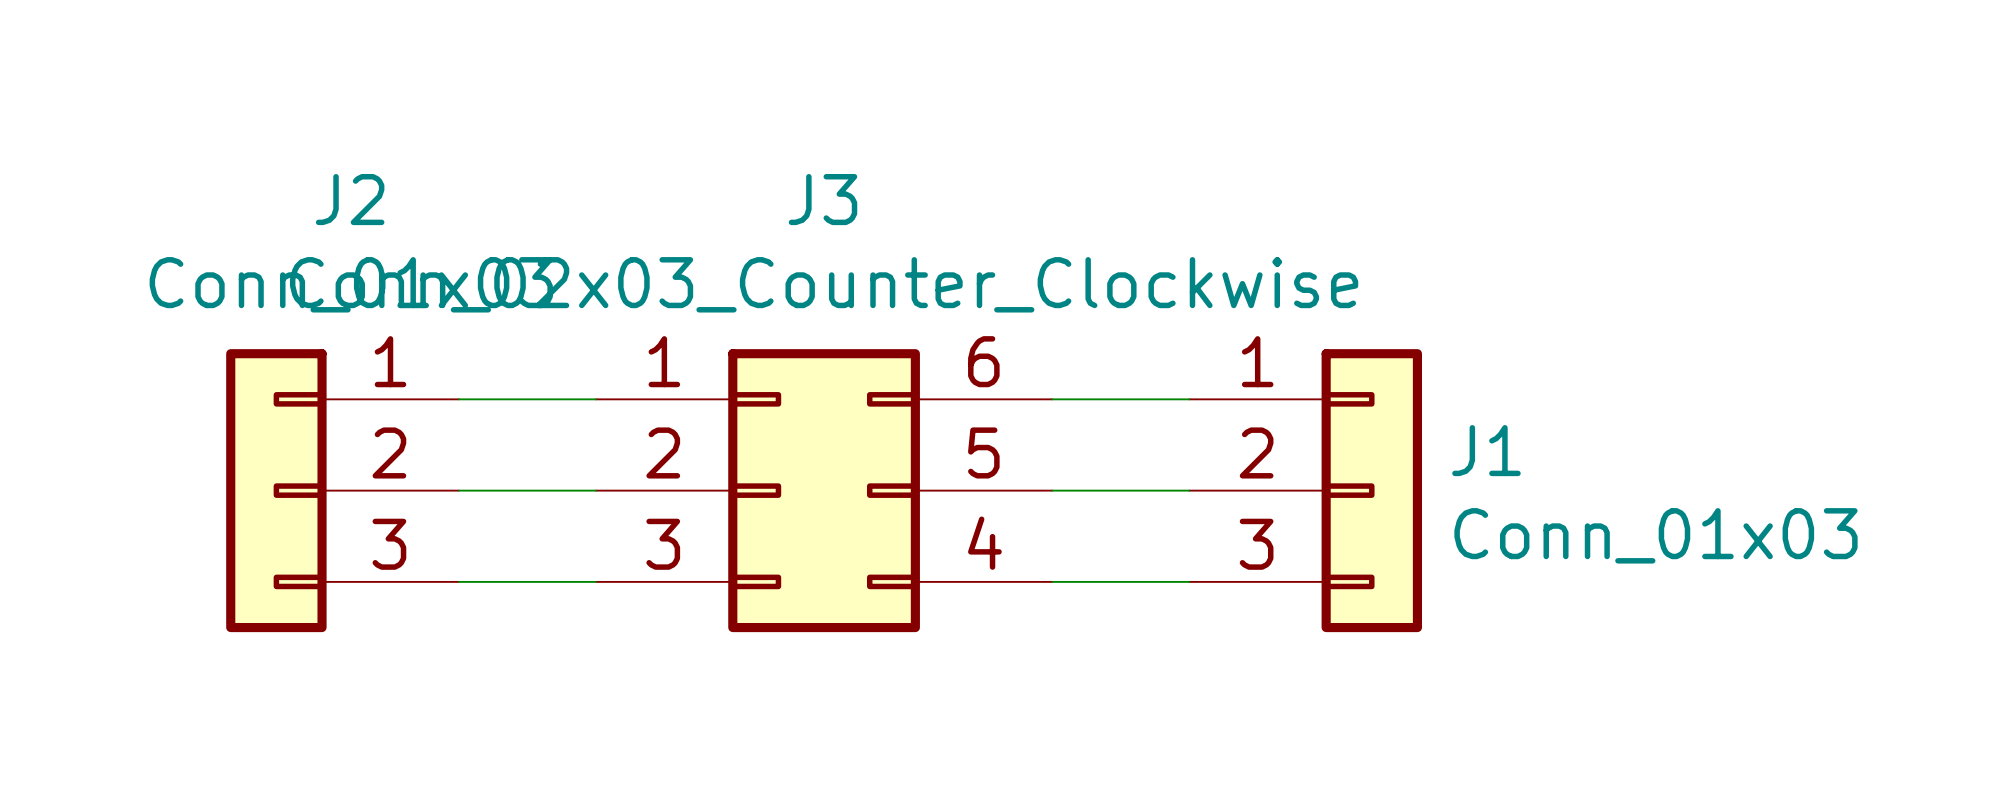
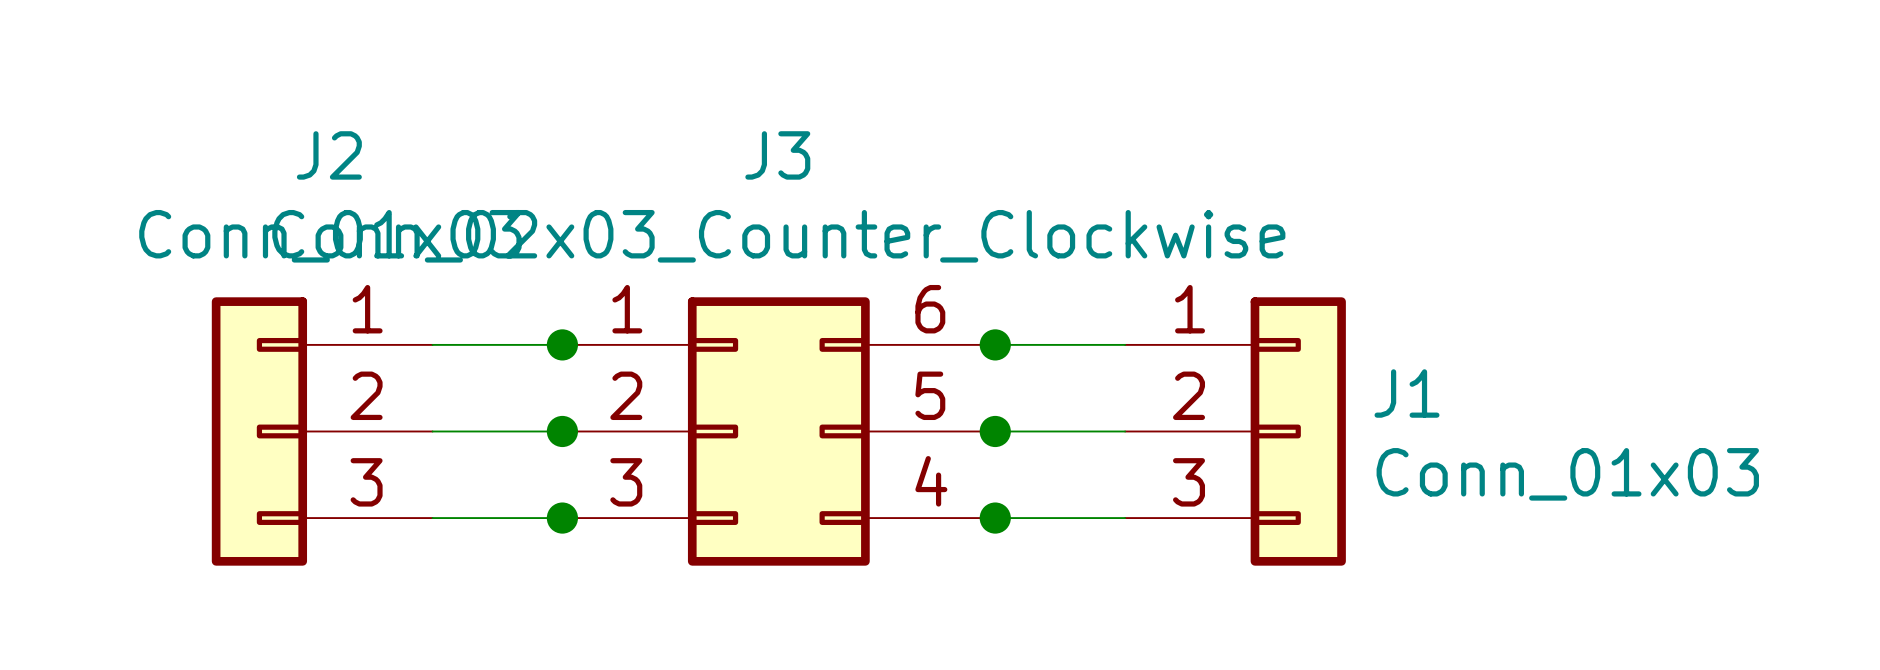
junction: none -> (562, 344)
junction: none -> (995, 344)
junction: none -> (562, 431)
junction: none -> (995, 431)
junction: none -> (562, 518)
junction: none -> (995, 518)

